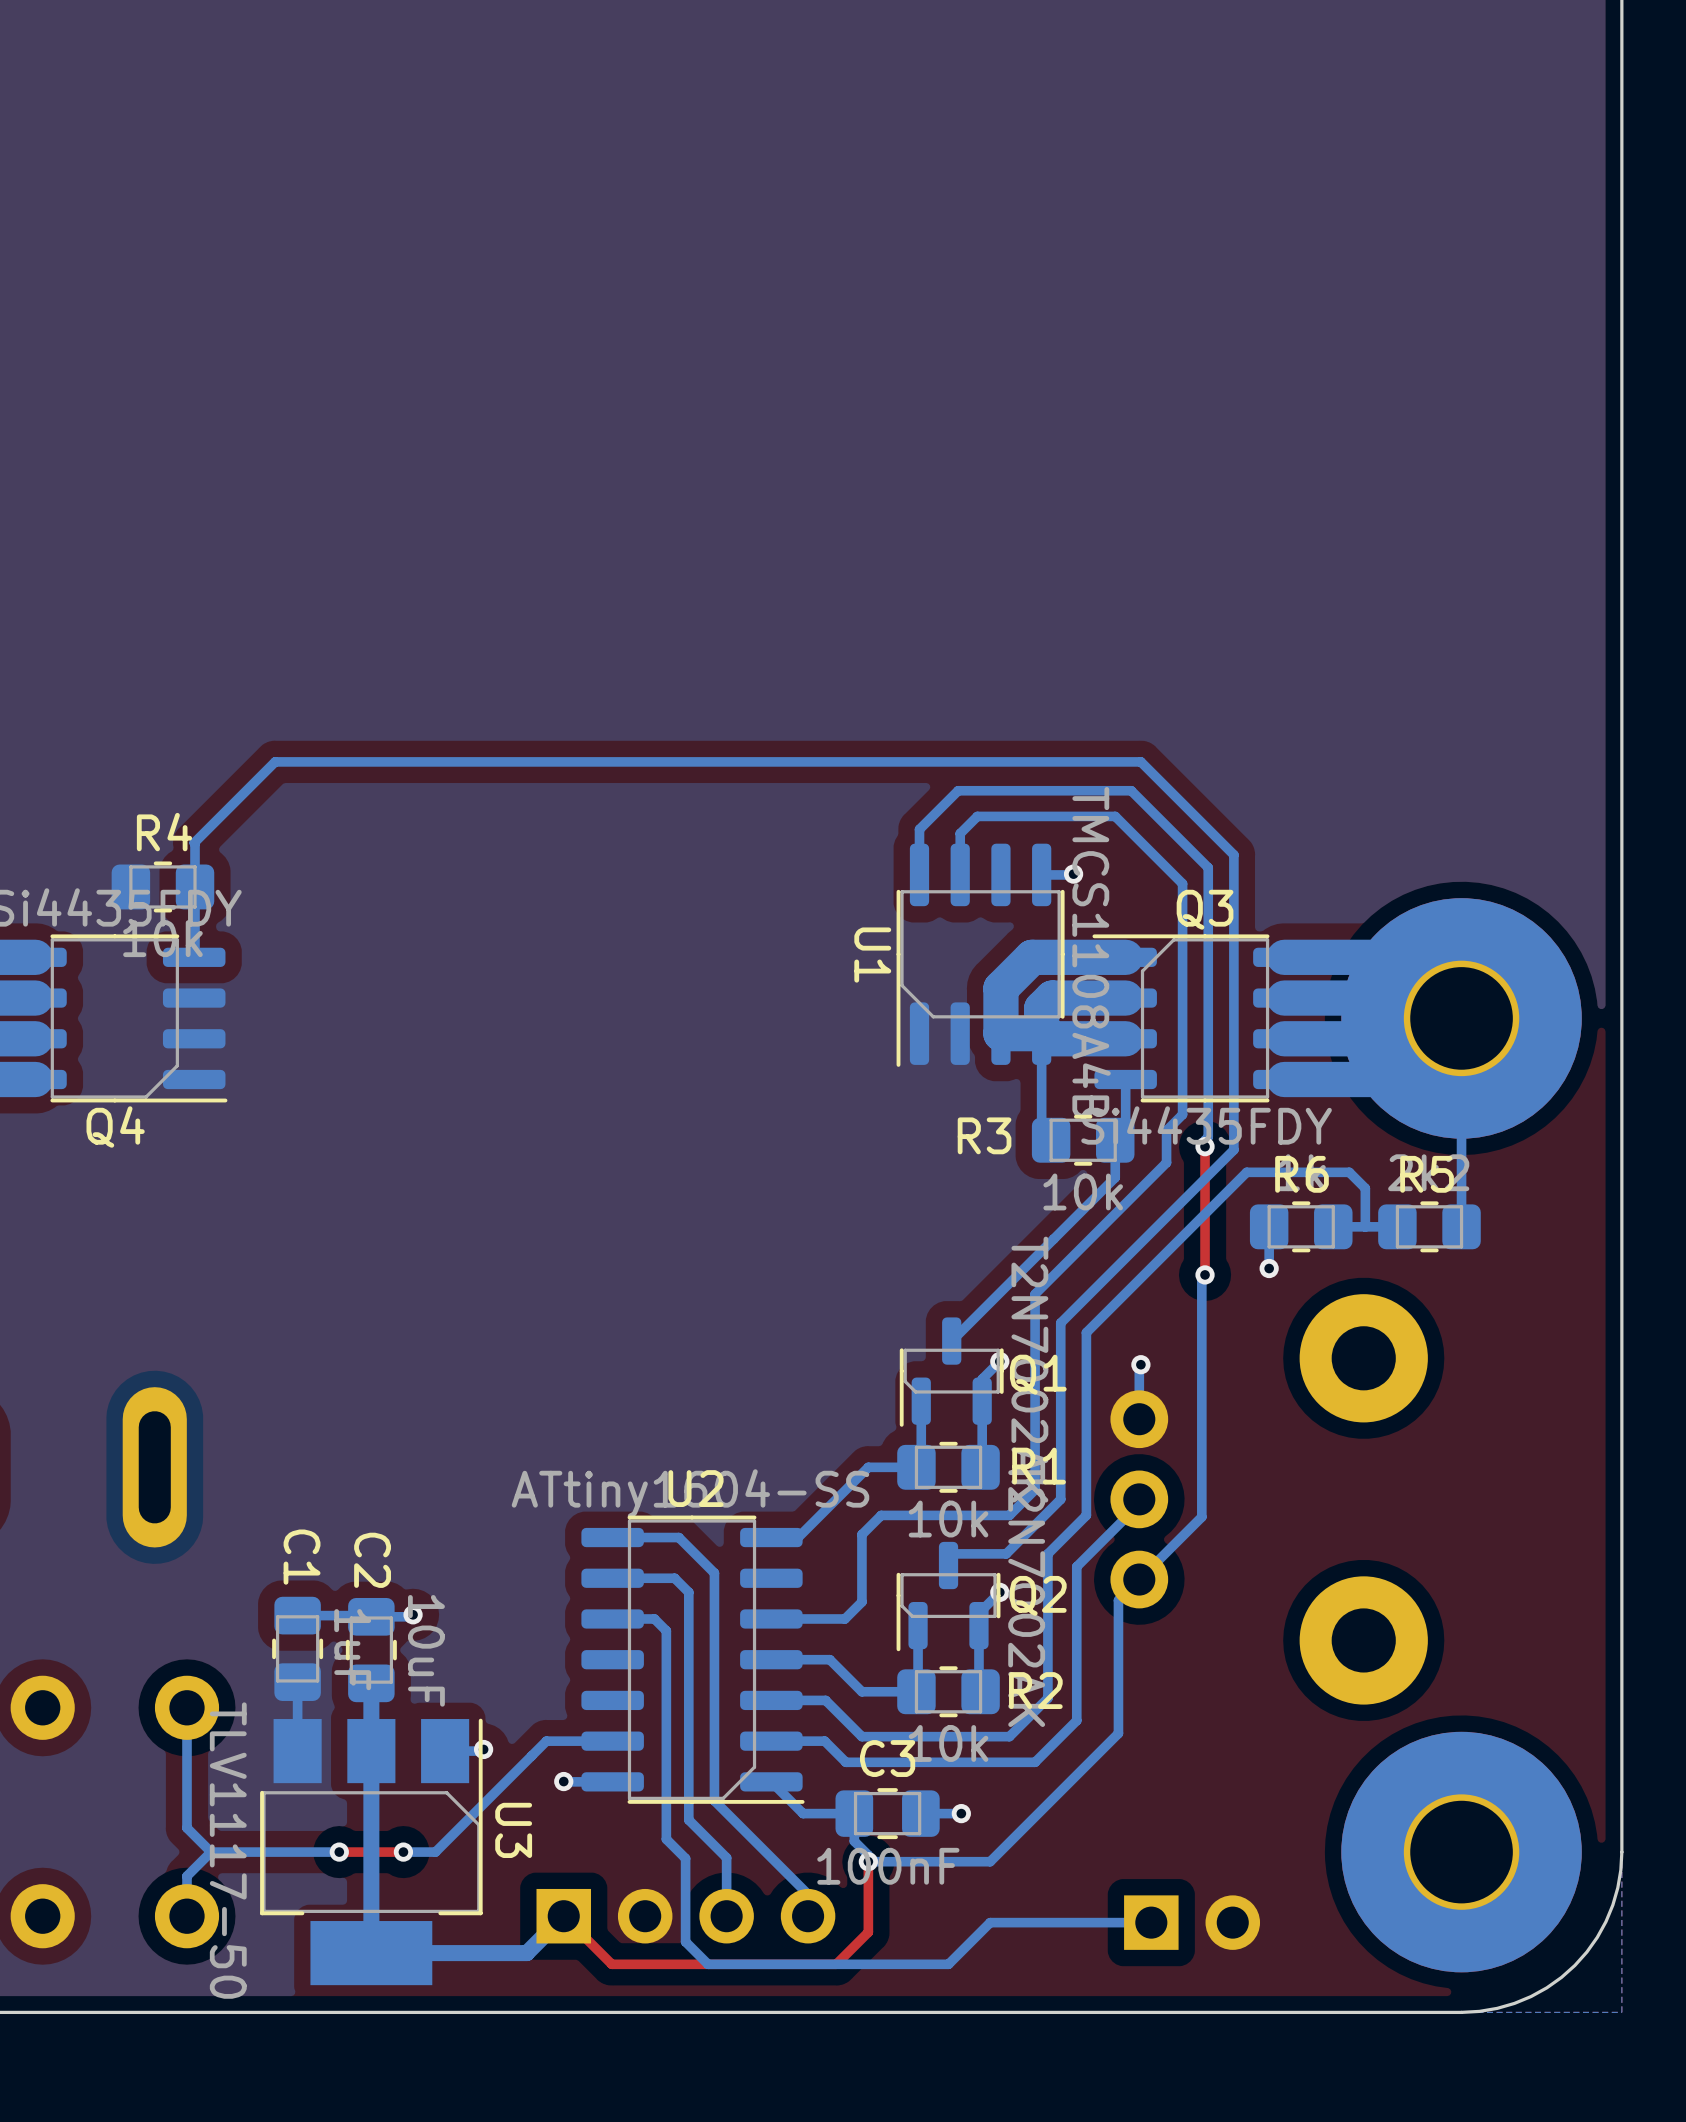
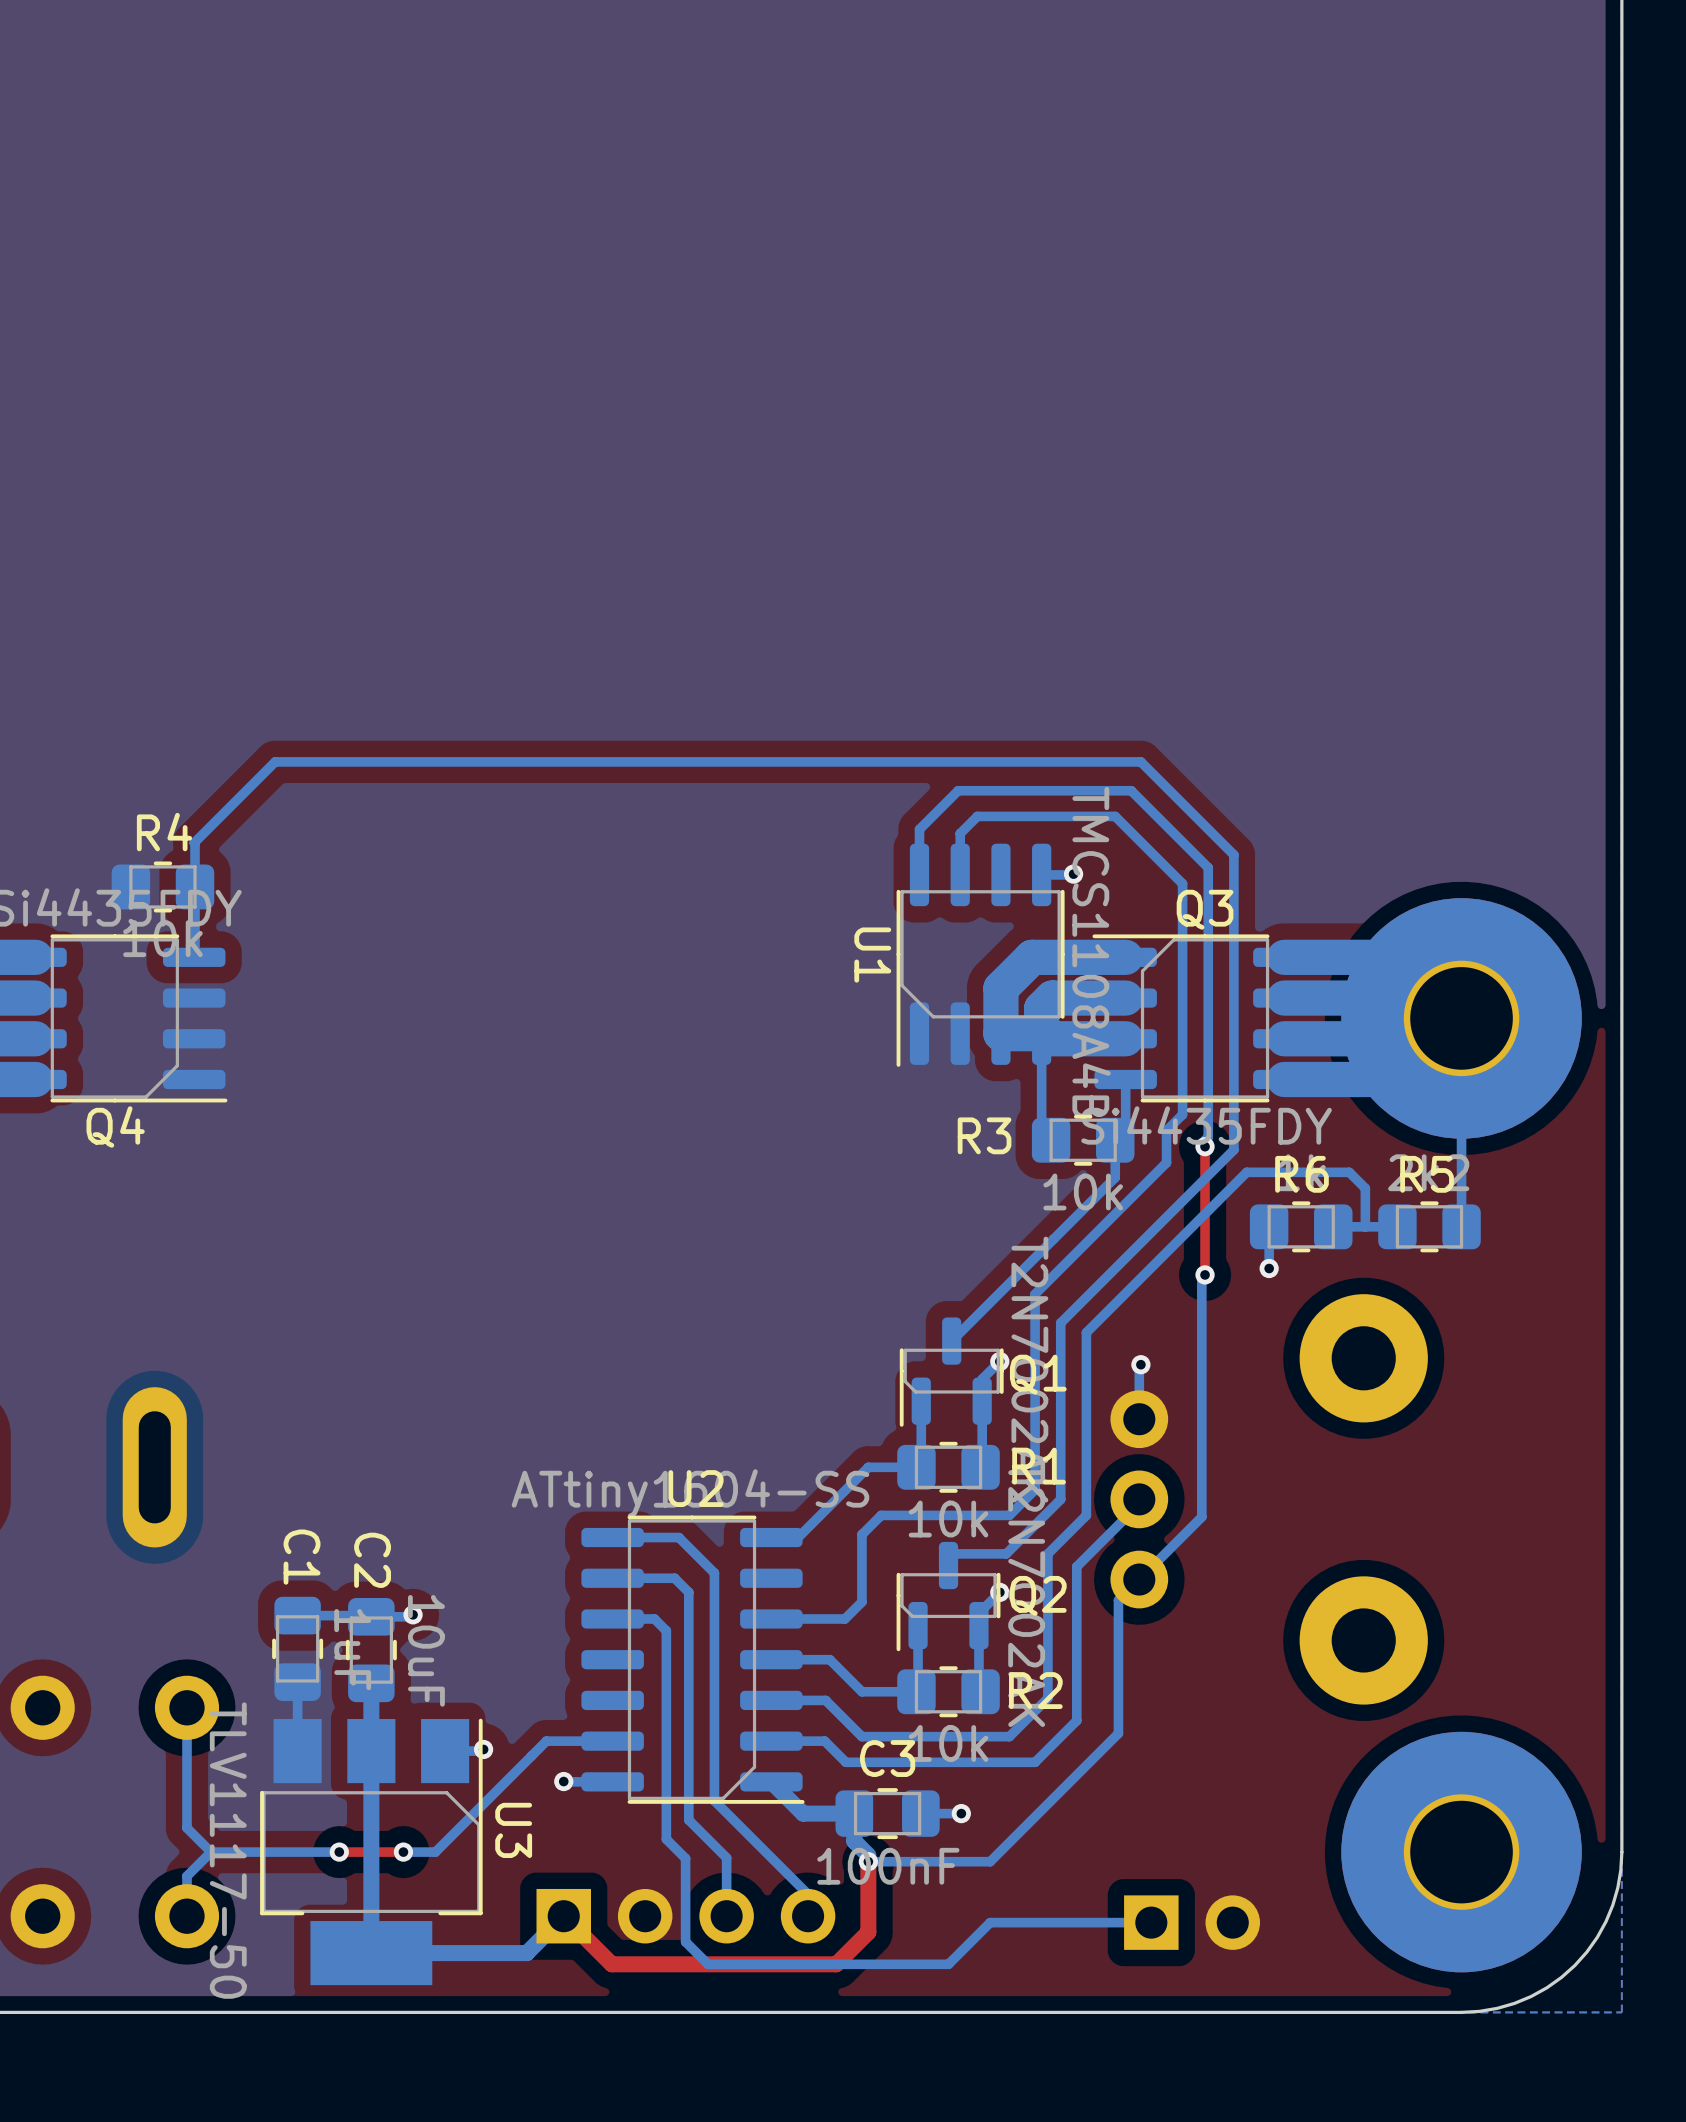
bottom track width: thin (771, 1781) (803, 1813) (854, 1813) (854, 1841) (868, 1855) -> thick (771, 1781) (803, 1813) (854, 1813) (854, 1841) (868, 1855)
top track width: thin (868, 1861) (868, 1932) (836, 1964) (611, 1964) (563, 1916) -> thick (868, 1861) (868, 1932) (836, 1964) (611, 1964) (563, 1916)

